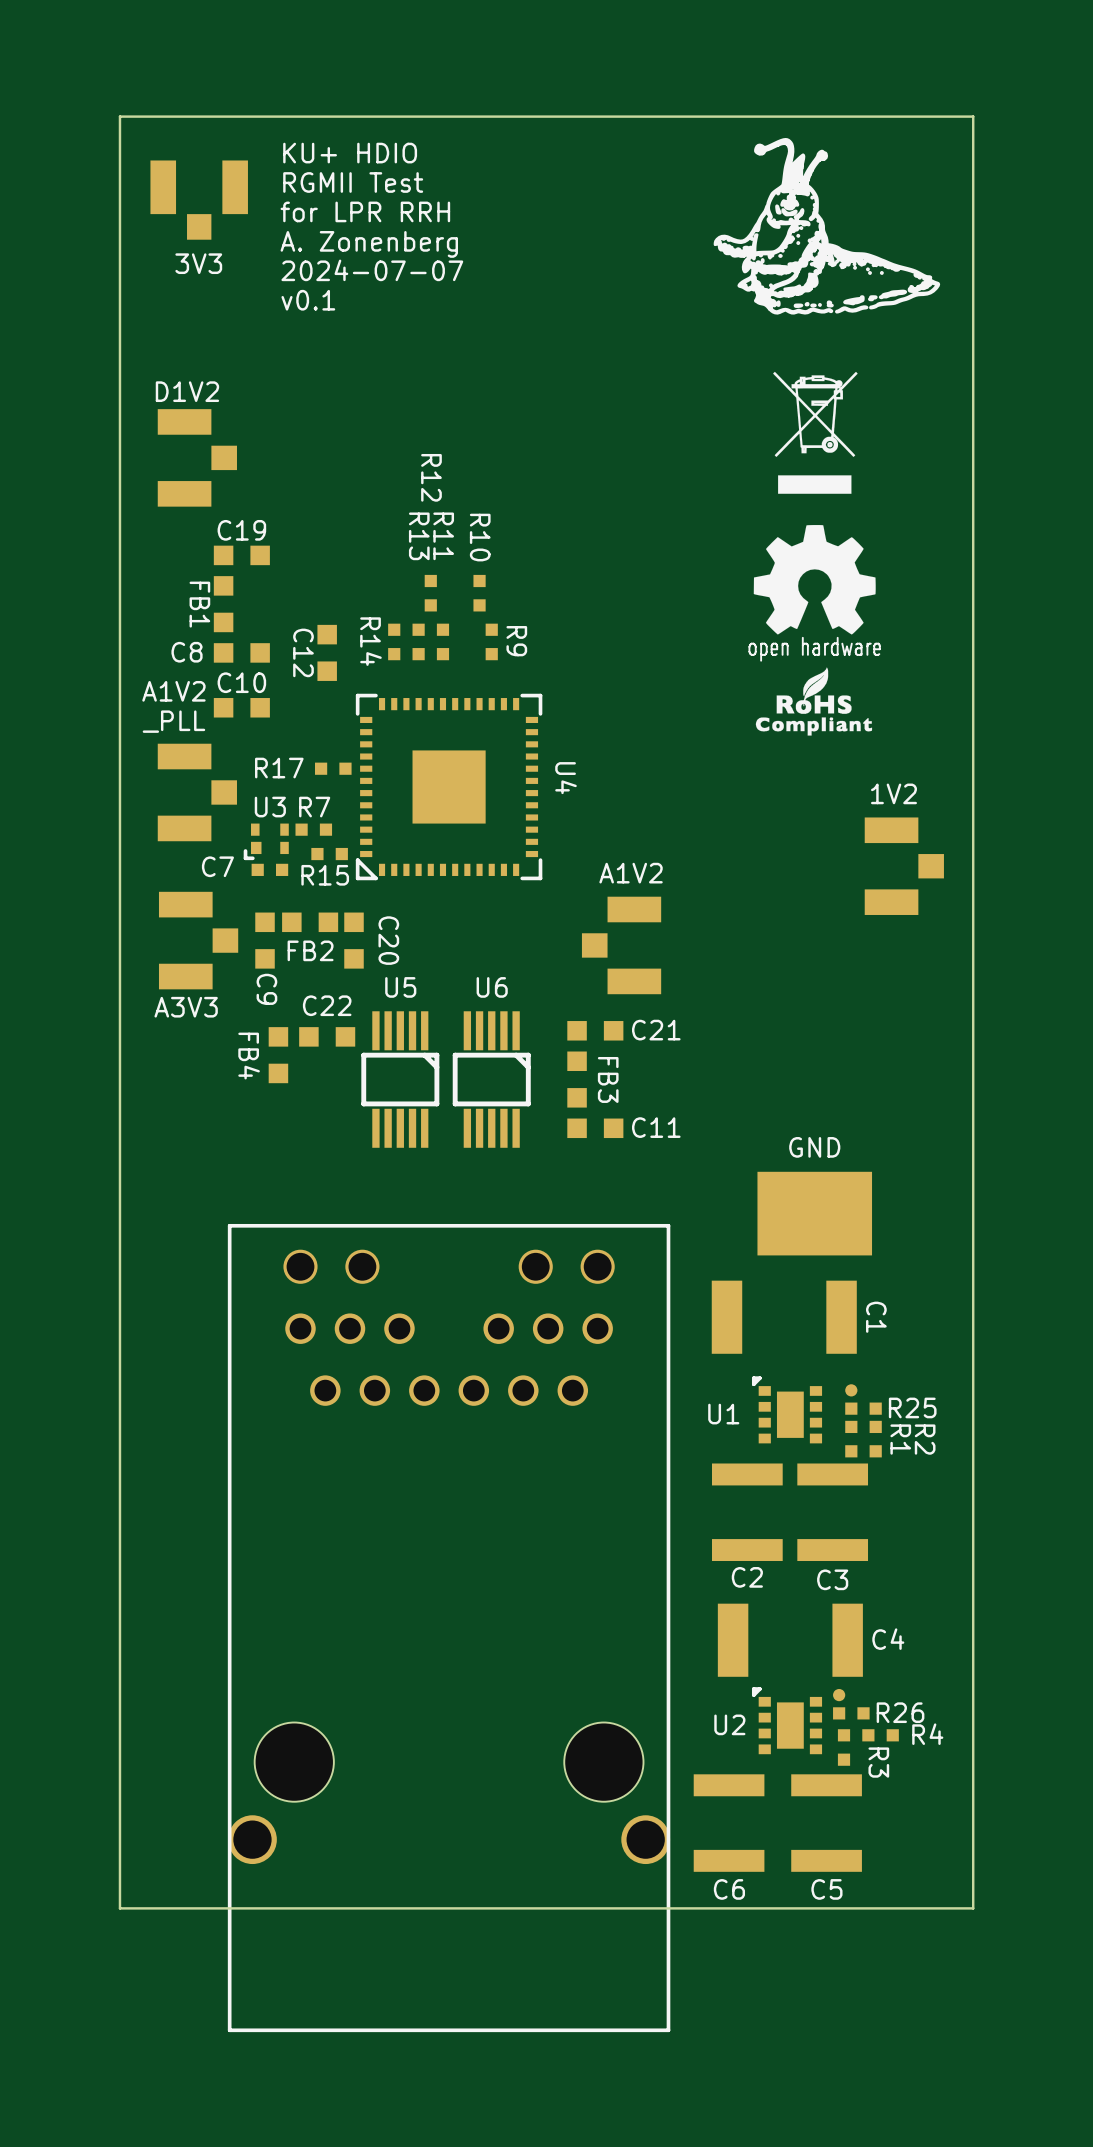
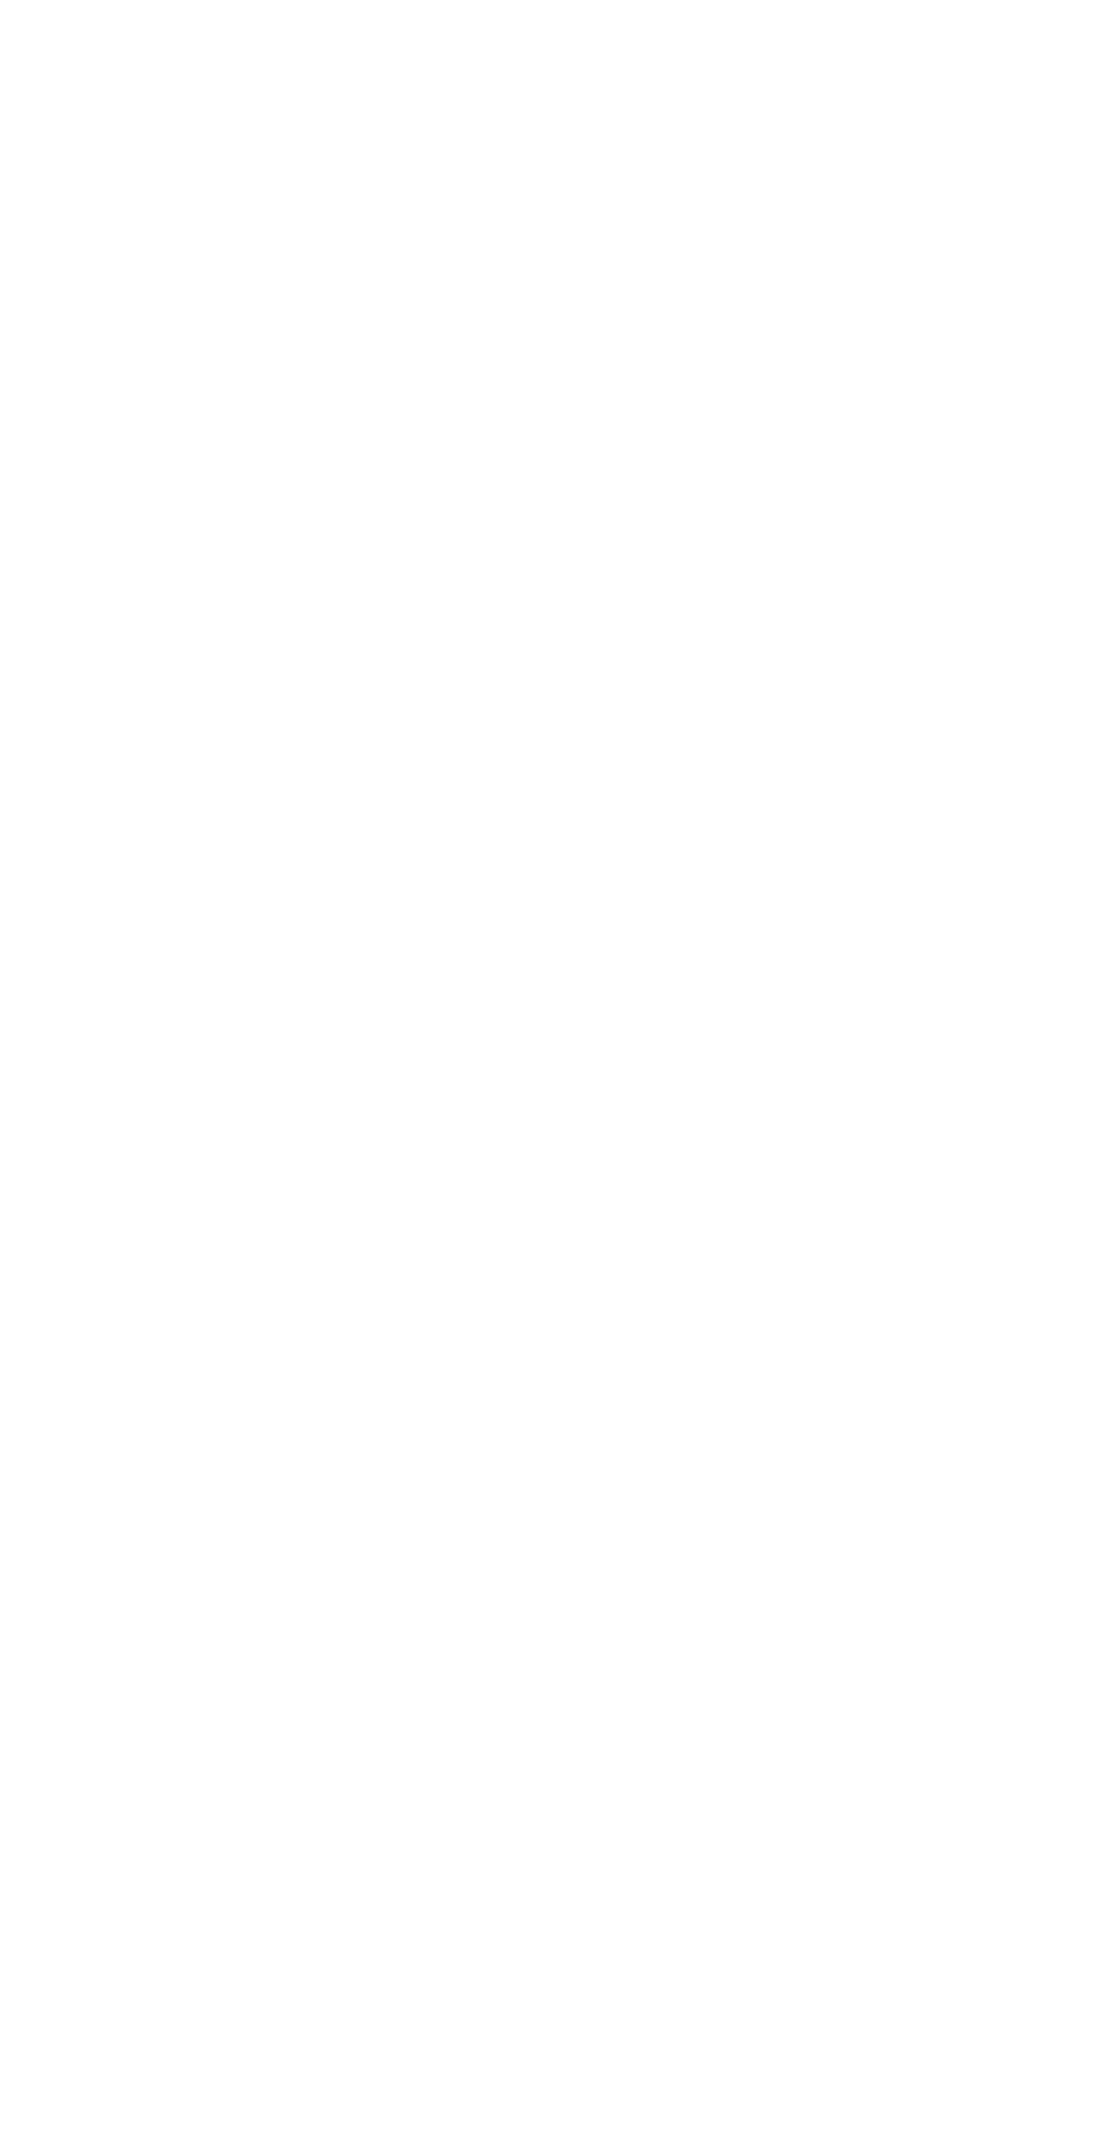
board edge: (119, 116) (973, 116) (973, 1908) (119, 1908) (119, 116) -> none
drawing: [713, 137, 941, 315] -> none
text: KU+ HDIO (350, 153) -> none
text: RGMII Test (353, 182) -> none
part: (199, 200) -> none
text: for LPR RRH (365, 211) -> none
text: A. Zonenberg (369, 244) -> none
text: 3V3 (198, 263) -> none
text: 2024-07-07 (372, 270) -> none
text: v0.1 (308, 300) -> none
drawing: [773, 371, 858, 494] -> none
text: D1V2 (187, 391) -> none
part: (197, 457) -> none
drawing: [748, 525, 881, 736] -> none
C19: (241, 555) -> none
R12: (430, 593) -> none
R10: (479, 593) -> none
FB1: (223, 604) -> none
R14: (394, 641) -> none
R13: (418, 641) -> none
R11: (442, 641) -> none
R9: (491, 641) -> none
C8: (241, 652) -> none
C12: (327, 652) -> none
text: A1V2 (173, 691) -> none
C10: (241, 707) -> none
text: _PLL (173, 721) -> none
R17: (333, 768) -> none
U4: (449, 786) -> none
part: (197, 792) -> none
text: 1V2 (893, 793) -> none
R7: (313, 829) -> none
U3: (266, 841) -> none
R15: (329, 854) -> none
part: (904, 866) -> none
C7: (269, 869) -> none
text: A1V2 (631, 873) -> none
FB2: (310, 922) -> none
part: (198, 940) -> none
C9: (265, 940) -> none
C20: (354, 940) -> none
part: (621, 945) -> none
text: A3V3 (186, 1007) -> none
C21: (595, 1030) -> none
C22: (327, 1036) -> none
FB4: (278, 1055) -> none
U5: (400, 1079) -> none
U6: (491, 1079) -> none
FB3: (577, 1079) -> none
C11: (595, 1128) -> none
text: GND (814, 1147) -> none
part: (814, 1213) -> none
C1: (784, 1317) -> none
part: (851, 1390) -> none
R25: (863, 1408) -> none
U1: (787, 1409) -> none
R1: (851, 1439) -> none
R2: (875, 1439) -> none
C2: (747, 1512) -> none
C3: (832, 1512) -> none
part: (449, 1628) -> none
C4: (790, 1640) -> none
part: (839, 1695) -> none
R26: (851, 1713) -> none
U2: (787, 1720) -> none
R4: (880, 1735) -> none
R3: (844, 1747) -> none
C6: (729, 1823) -> none
C5: (826, 1823) -> none

